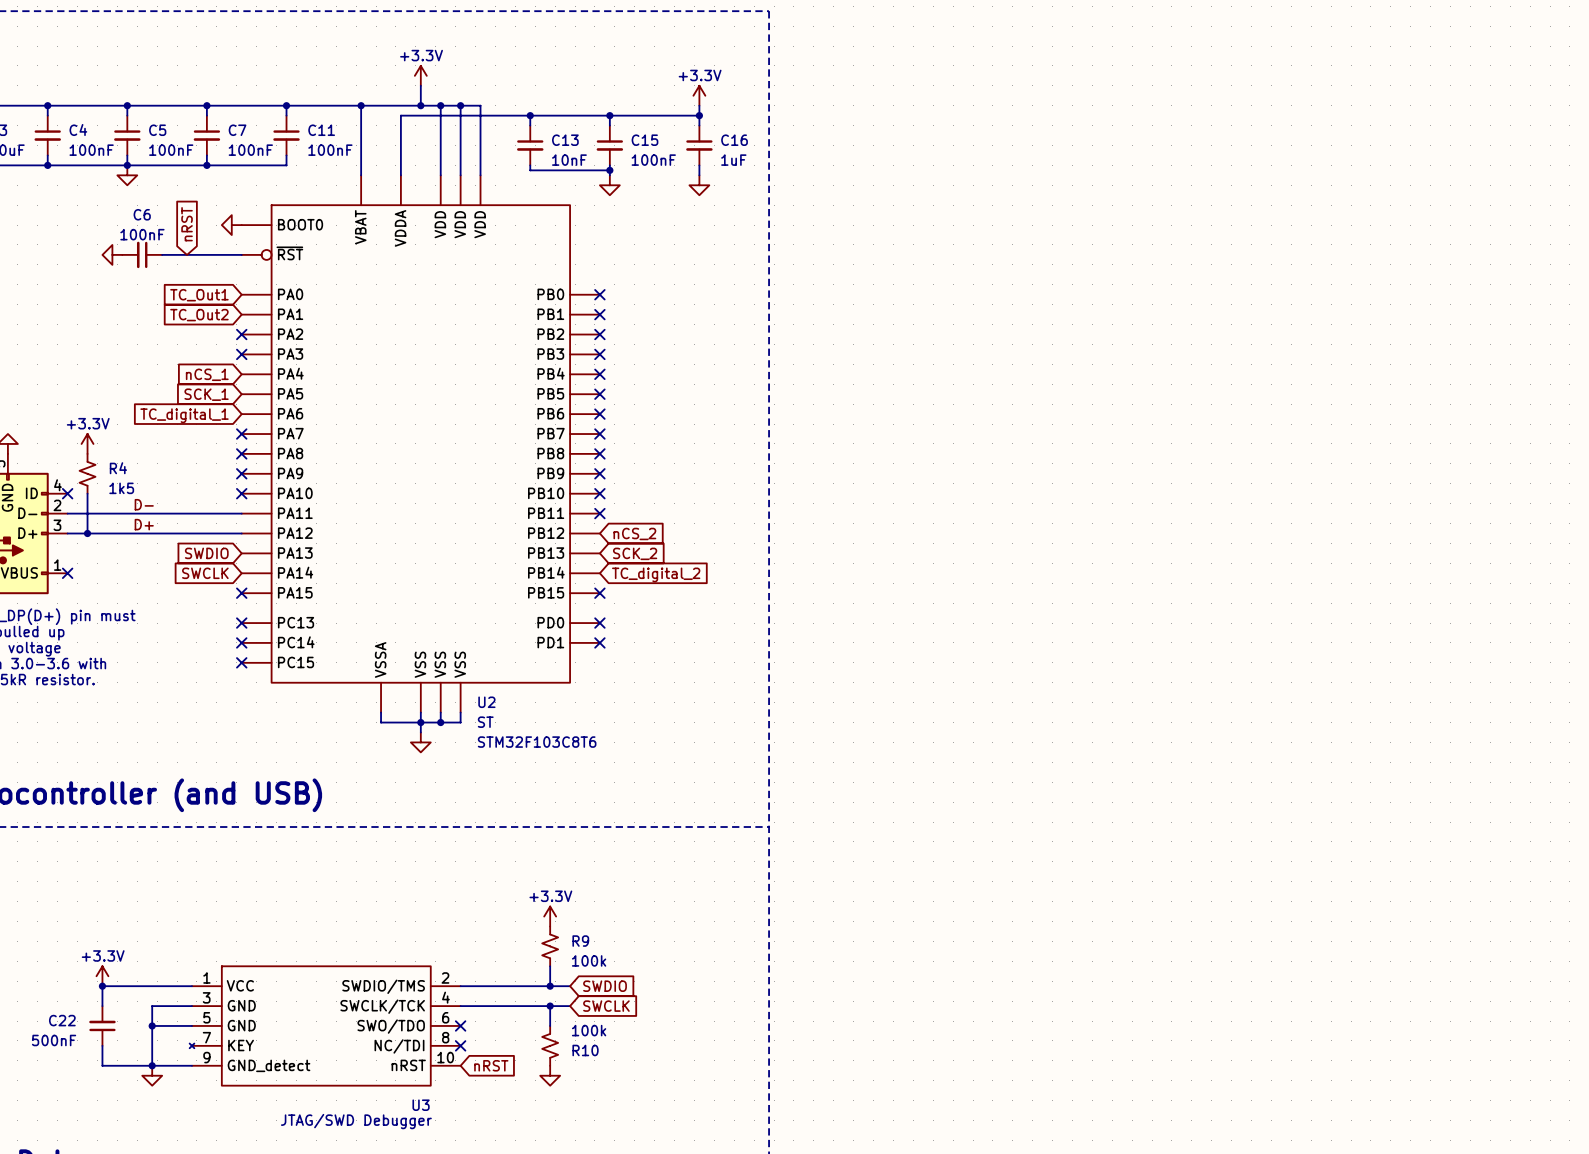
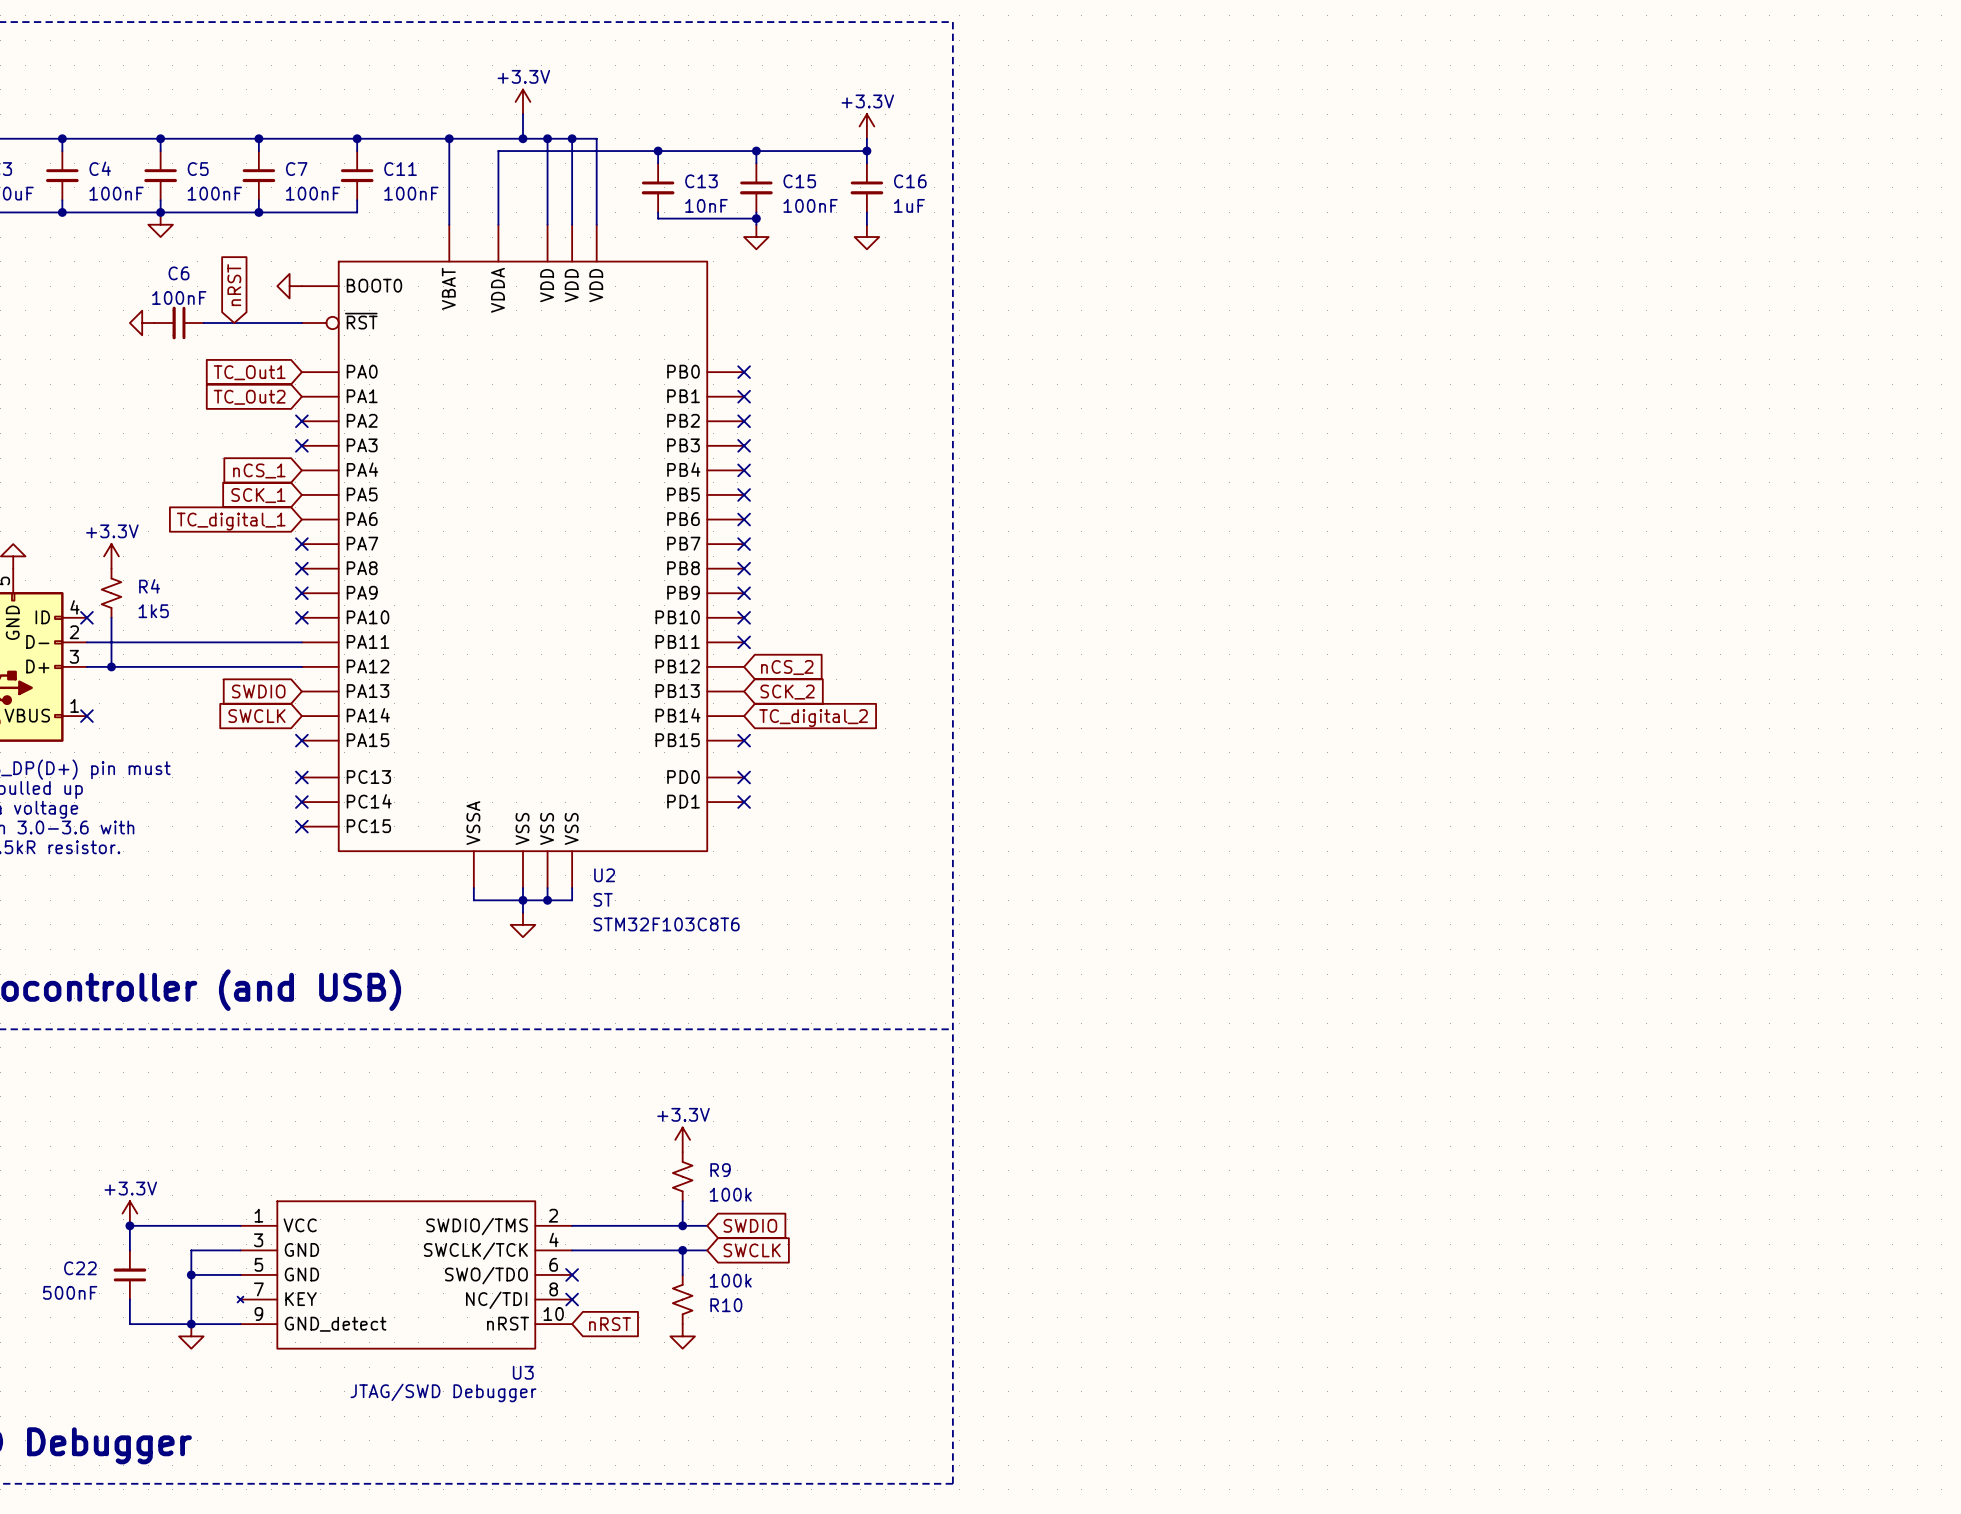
label: D- (144, 504) -> none
label: D+ (144, 524) -> none

